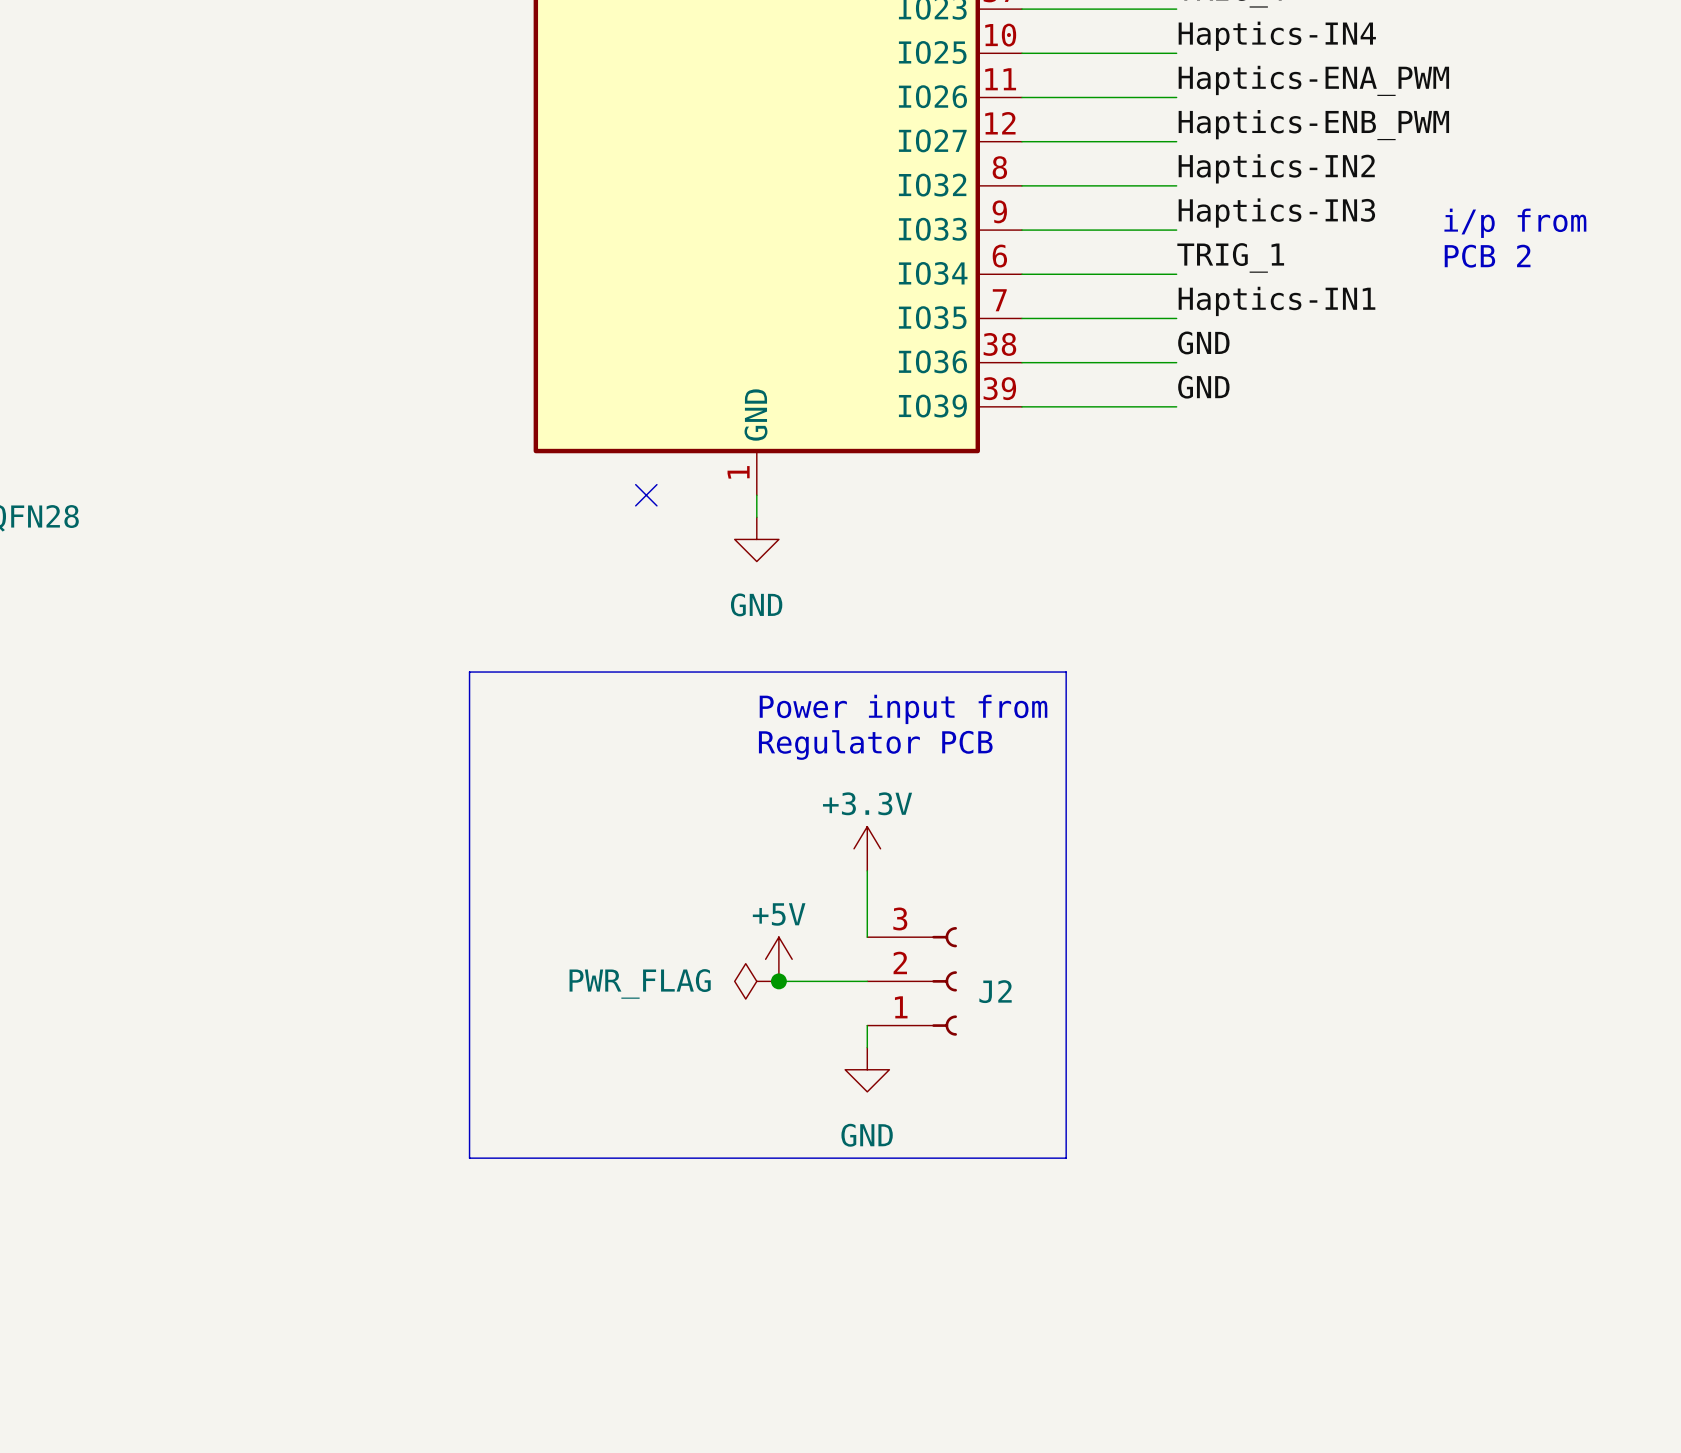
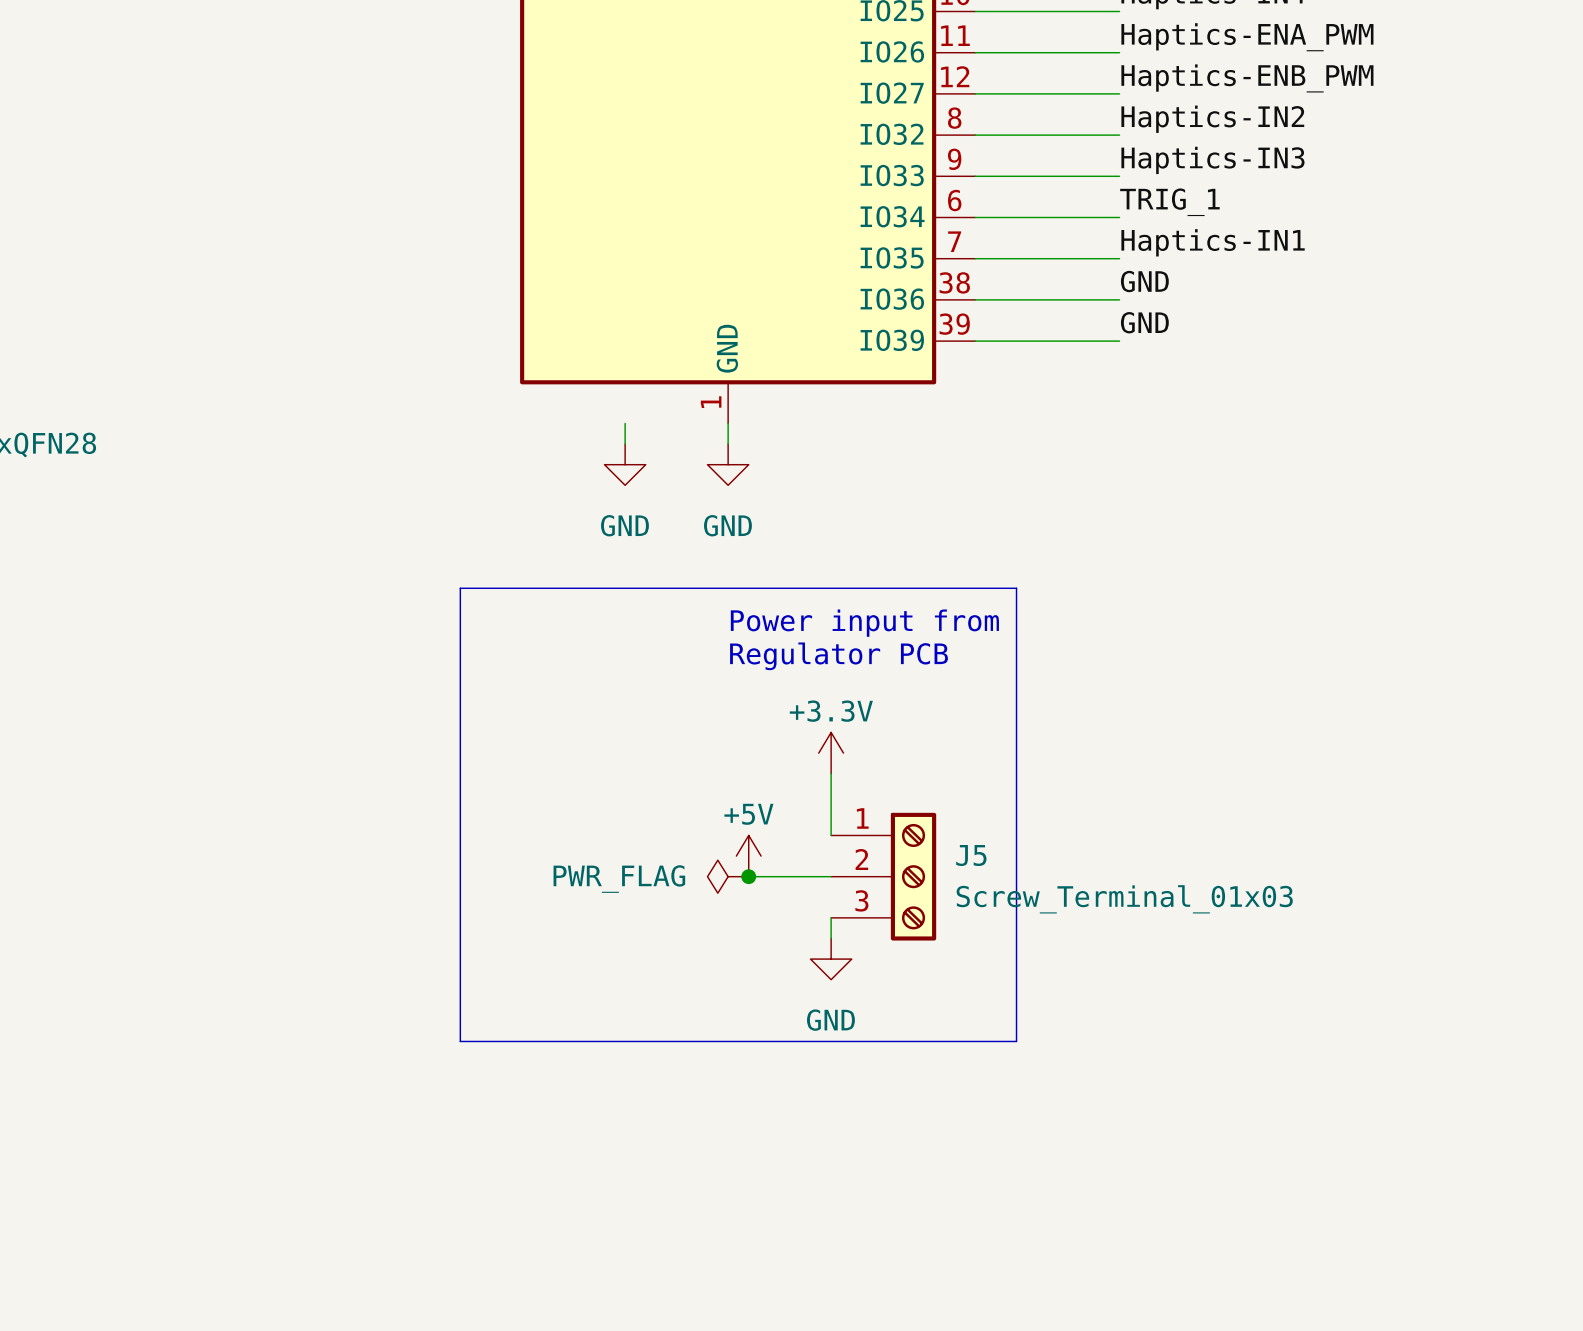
text: i/p from (1515, 223) -> none
text: PCB 2 (1487, 256) -> none
wire: none -> (625, 423) (625, 444)
no-connect mark: (646, 495) -> none
power symbol: none -> GND (625, 464)
J2: (912, 981) -> none
J5: none -> Screw_Terminal_01x03 (883, 876)

